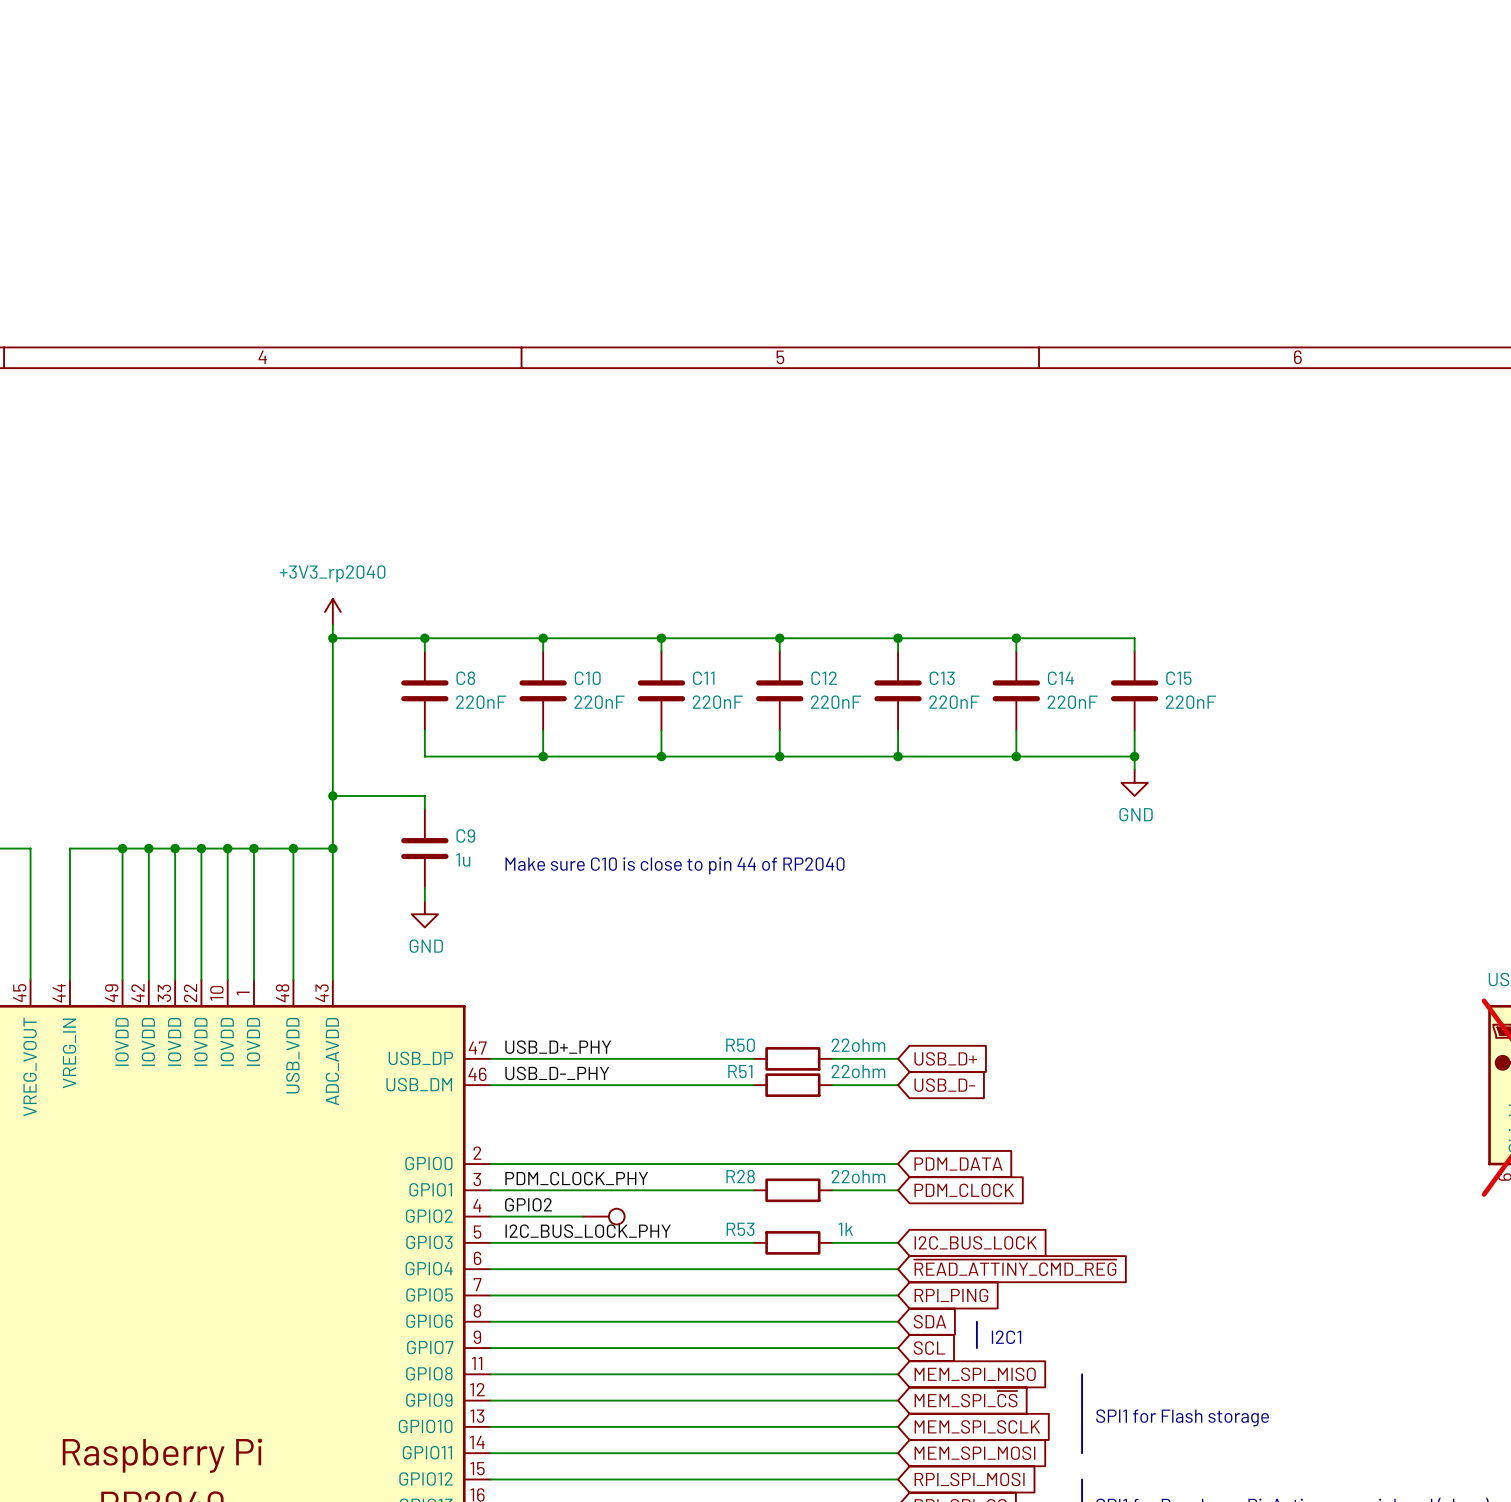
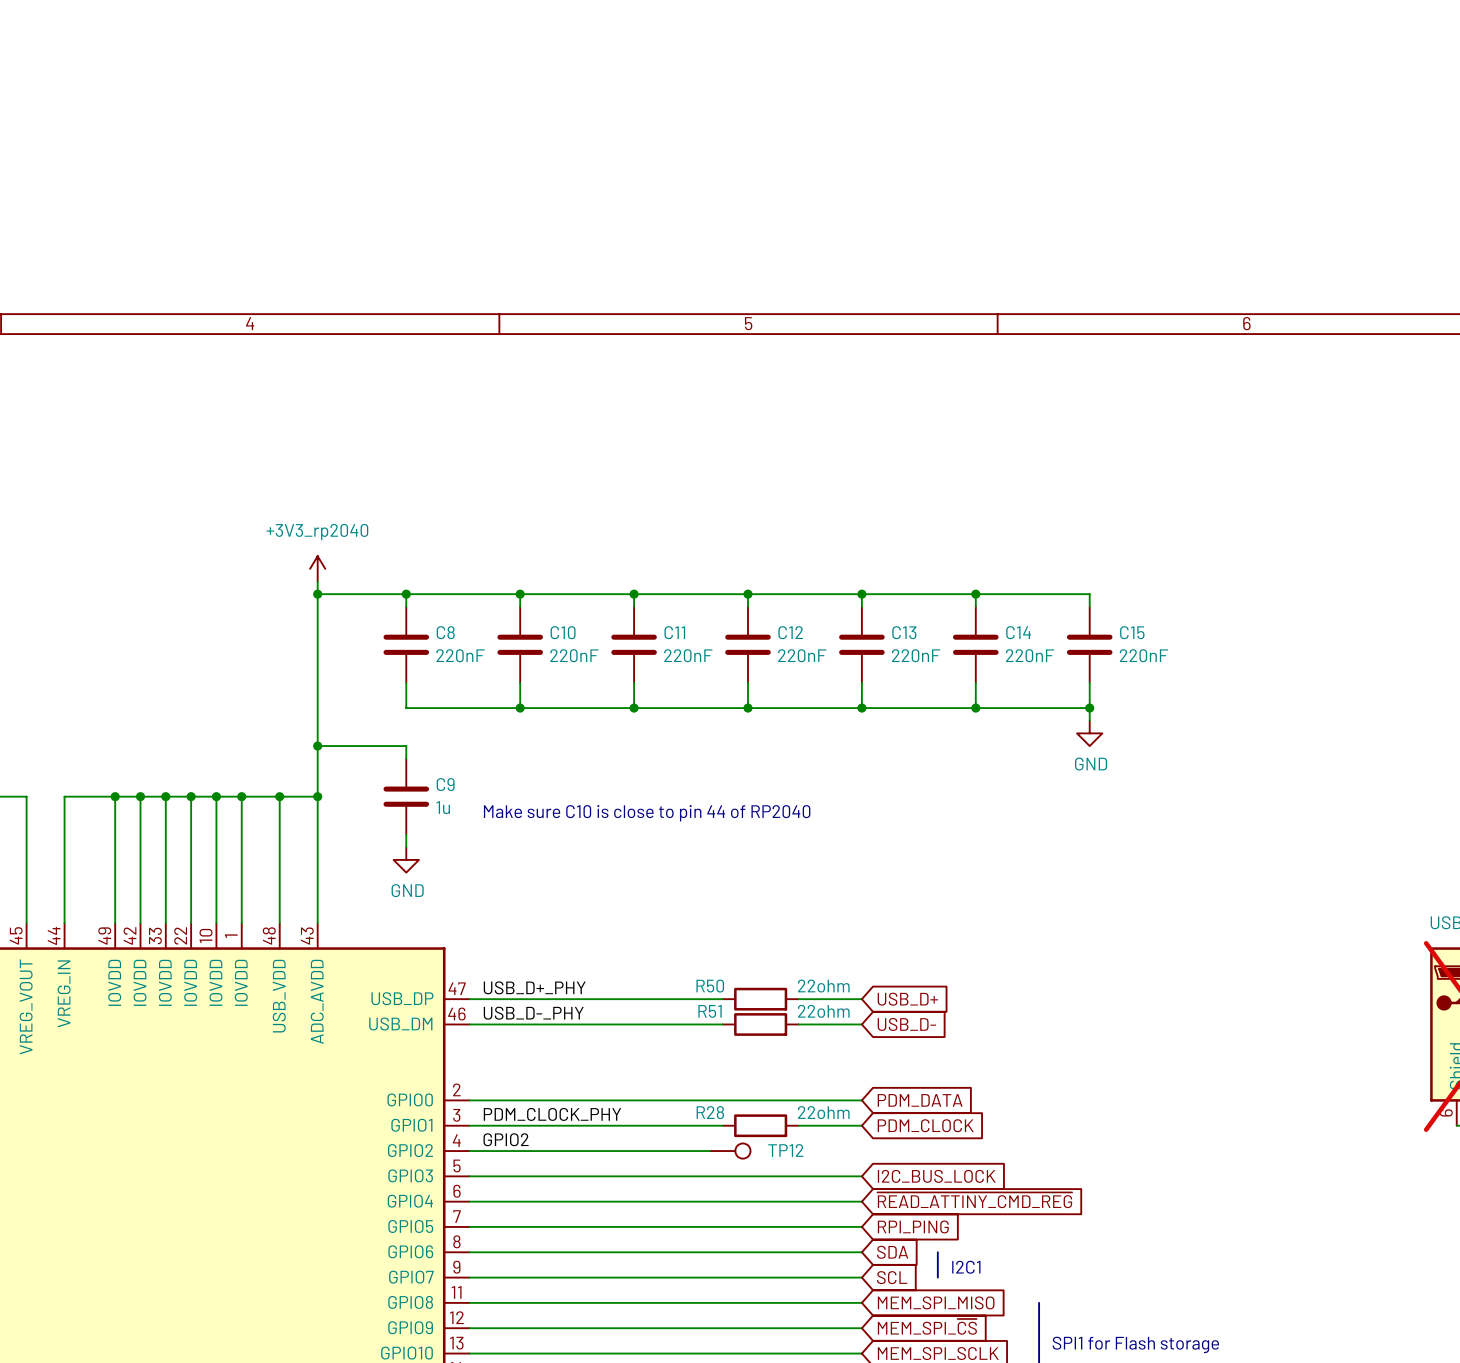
wire: none -> (558, 1151) (710, 1151)
part: (603, 1216) -> none
TP12: none -> (730, 1151)
label: I2C_BUS_LOCK_PHY (588, 1231) -> none
wire: none -> (722, 1176) (798, 1176)
R53: 1k (792, 1242) -> none

